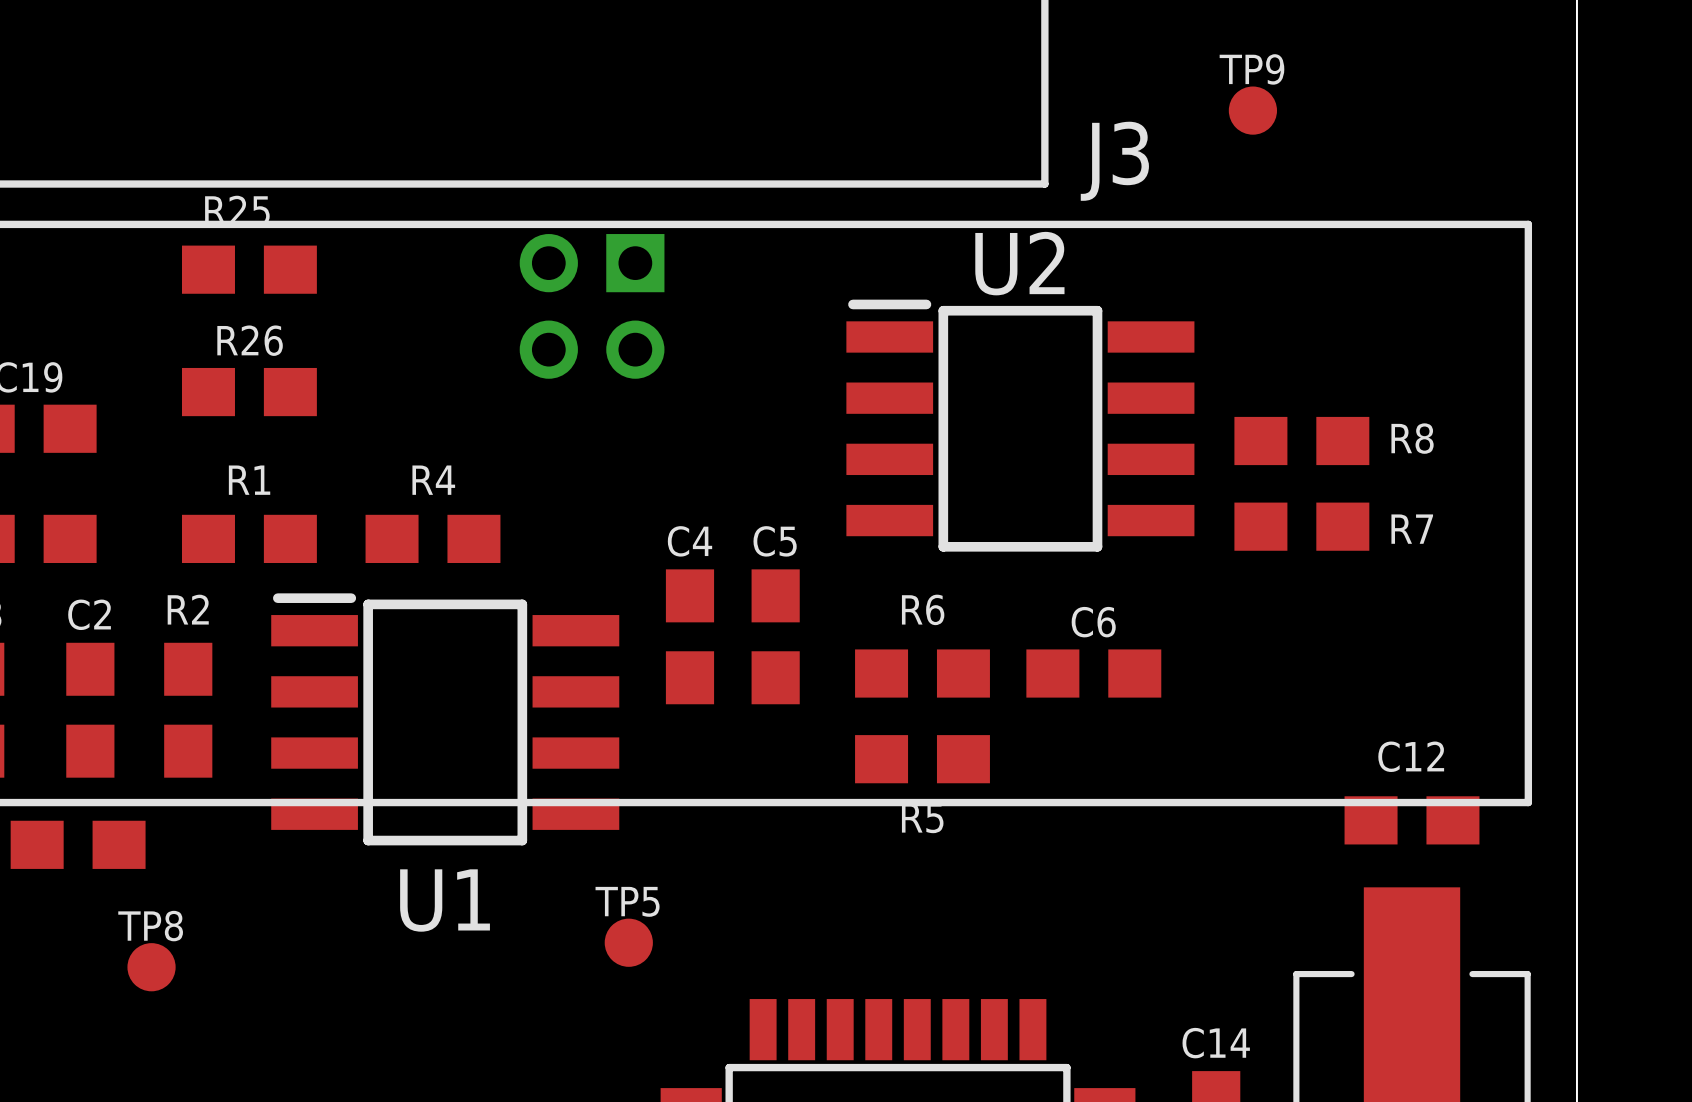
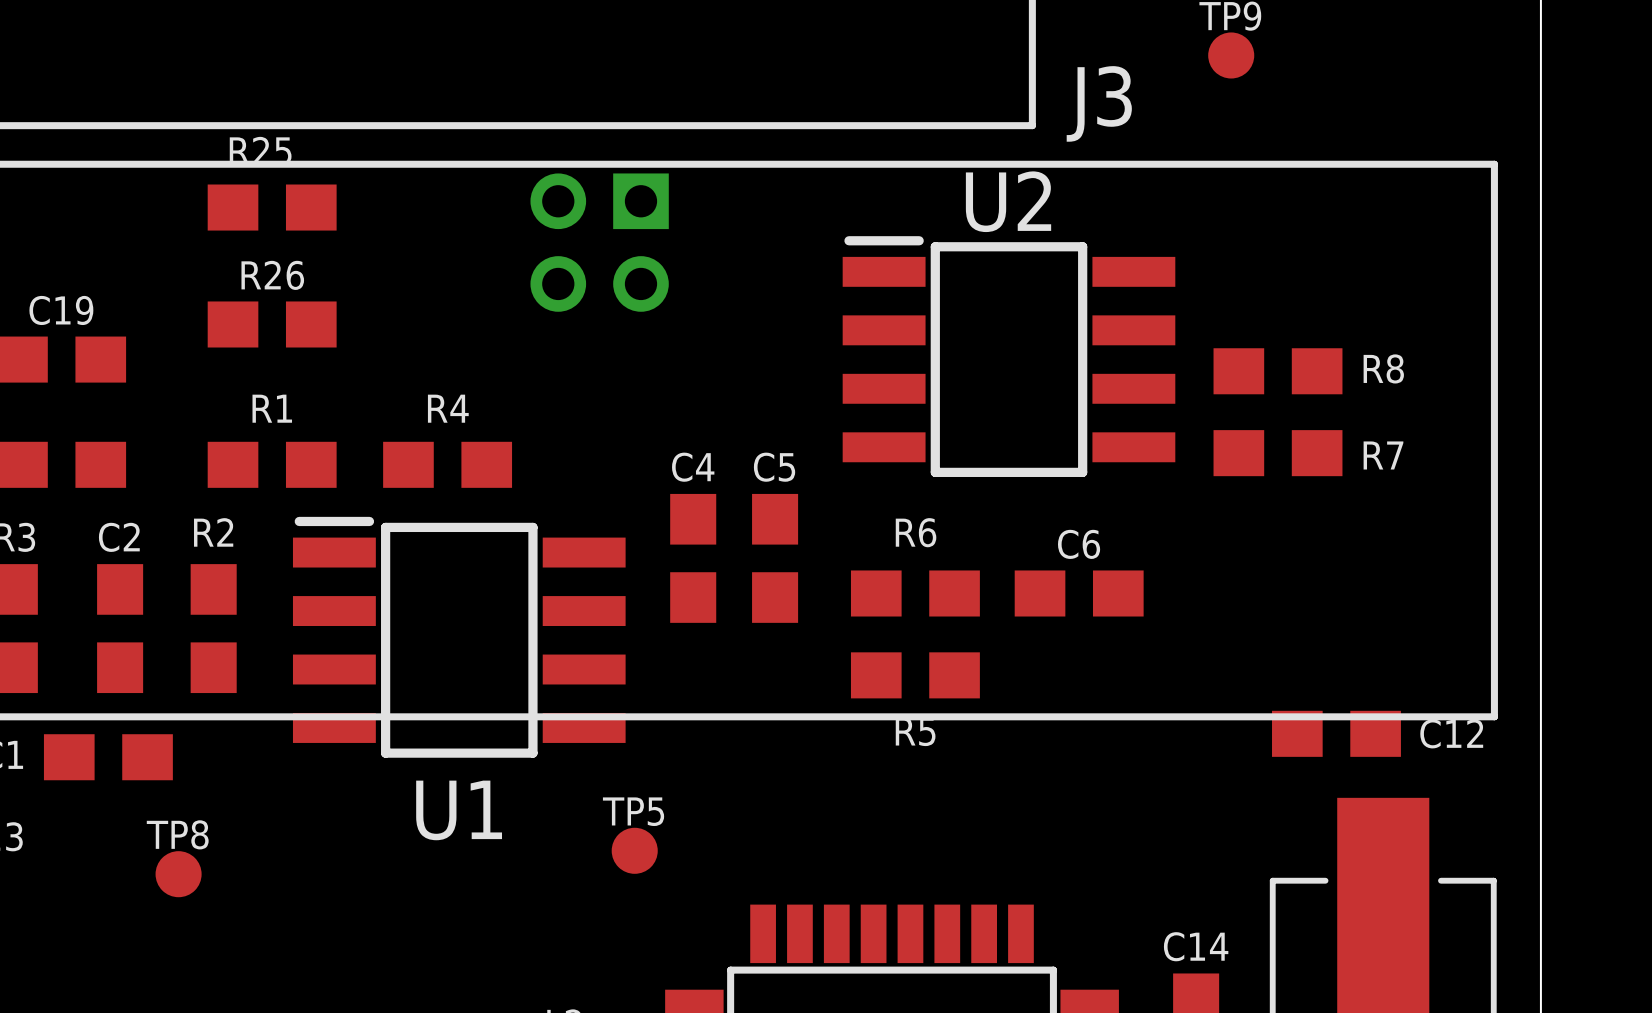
C12 name position: C12 (1411, 756) -> C12 (1451, 733)
C12 position: (1412, 820) -> (1336, 733)

